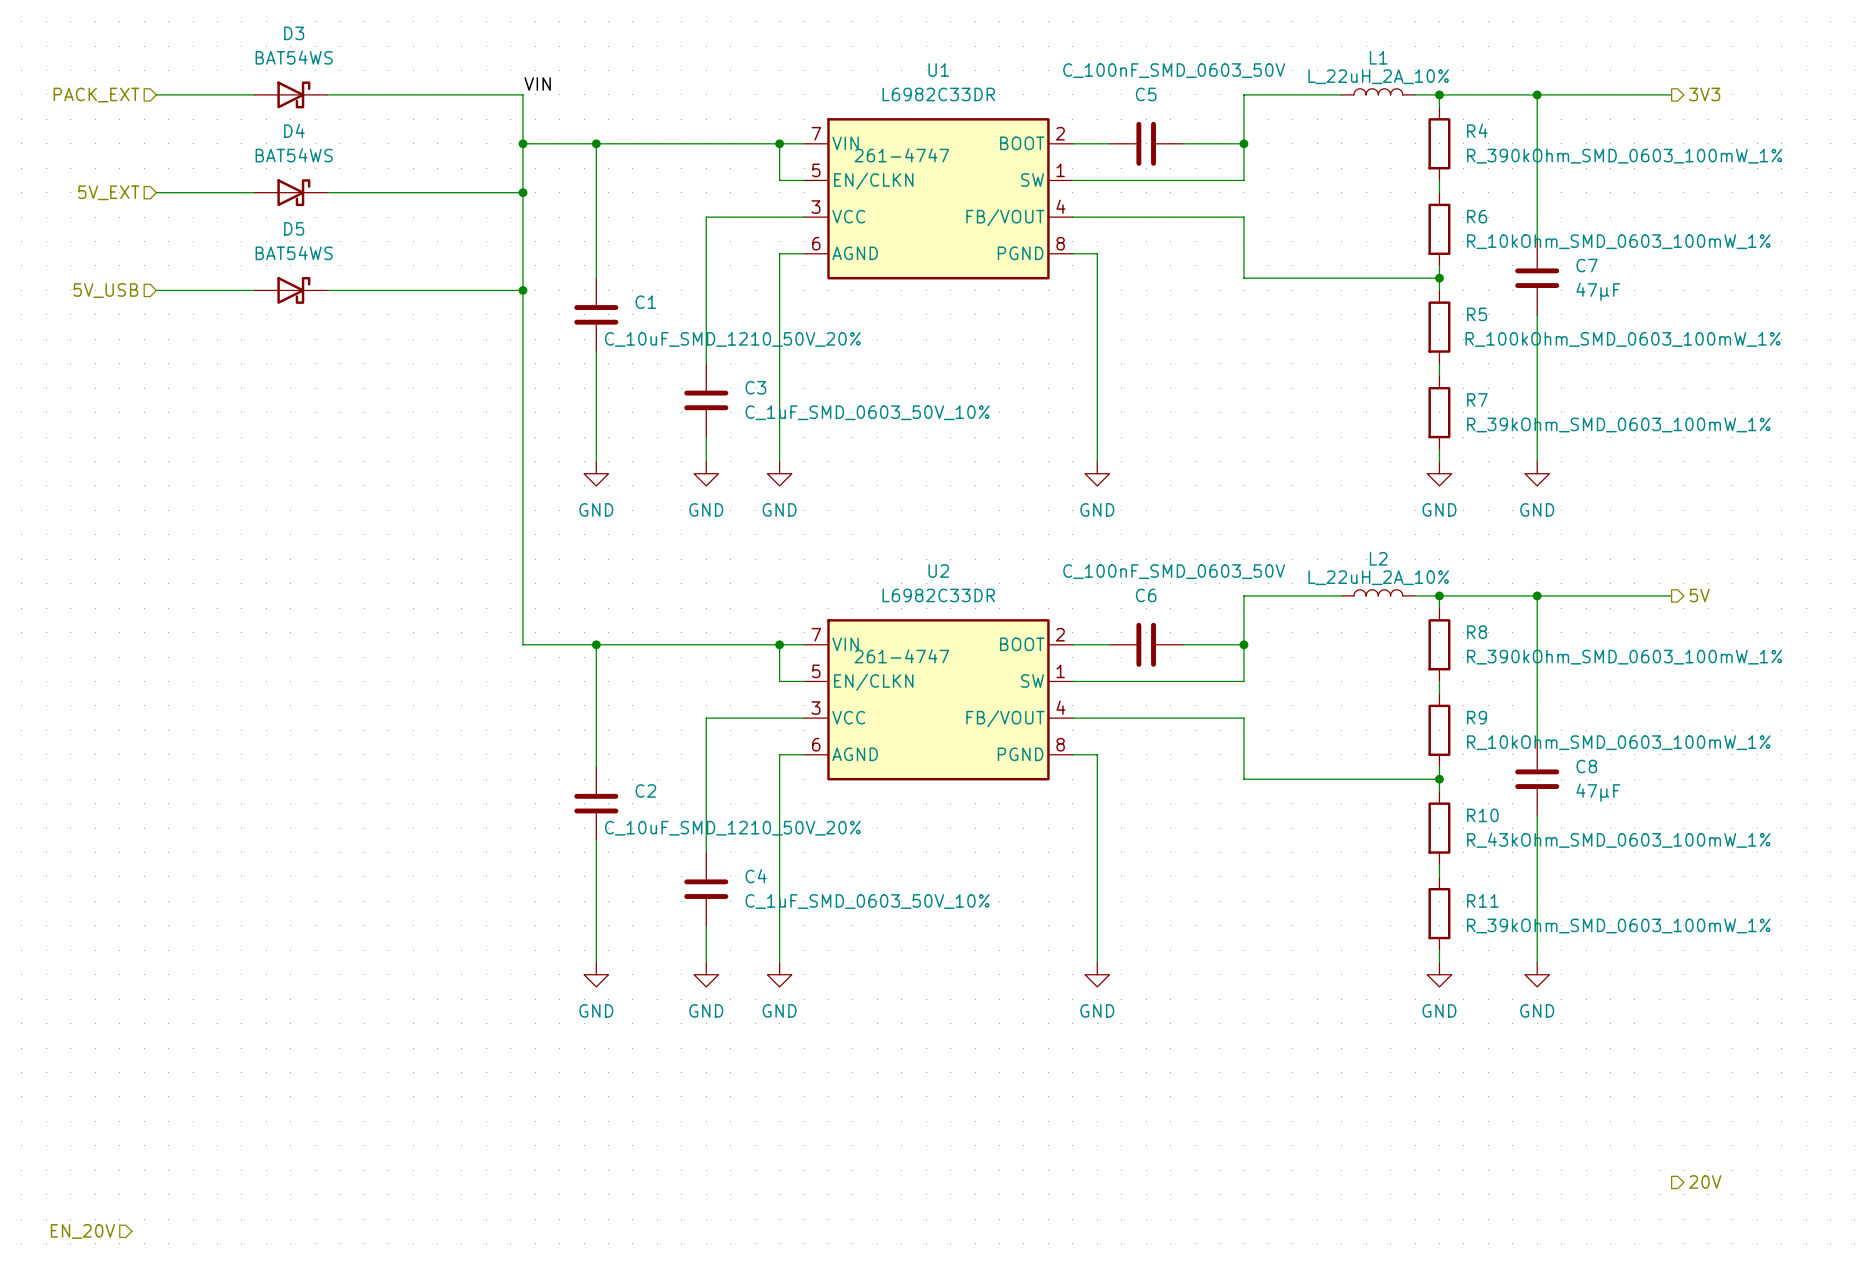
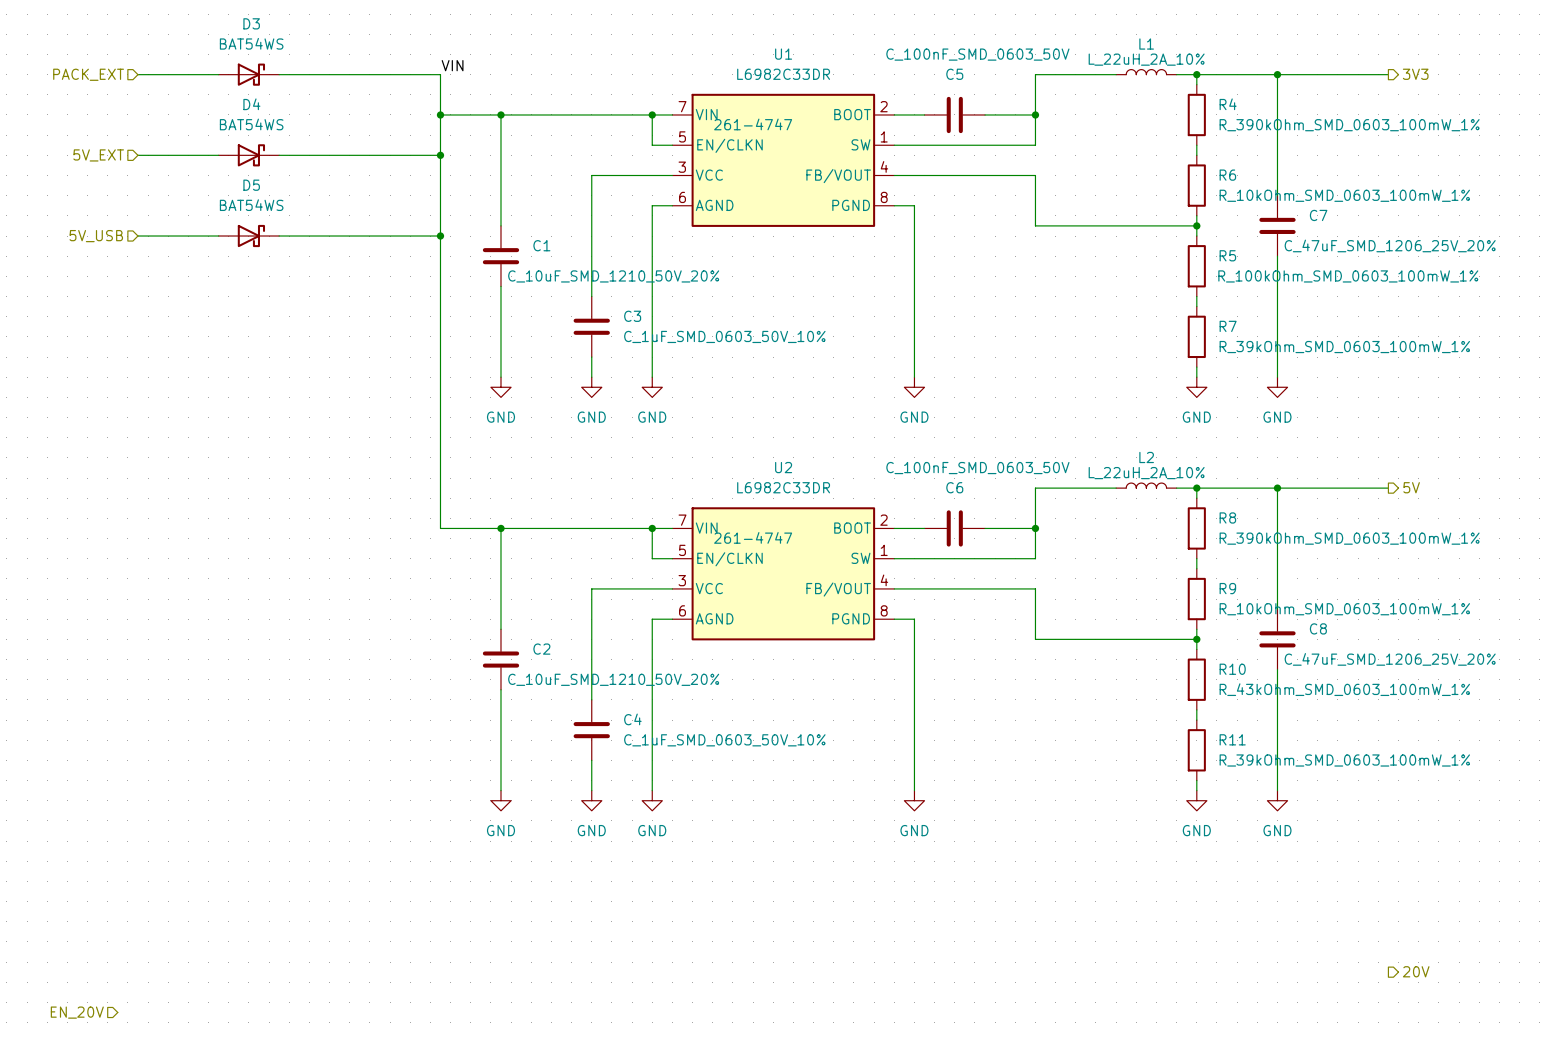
C7 value: 47µF (1598, 291) -> C_47uF_SMD_1206_25V_20% (1390, 245)
C8 value: 47µF (1598, 792) -> C_47uF_SMD_1206_25V_20% (1390, 659)

